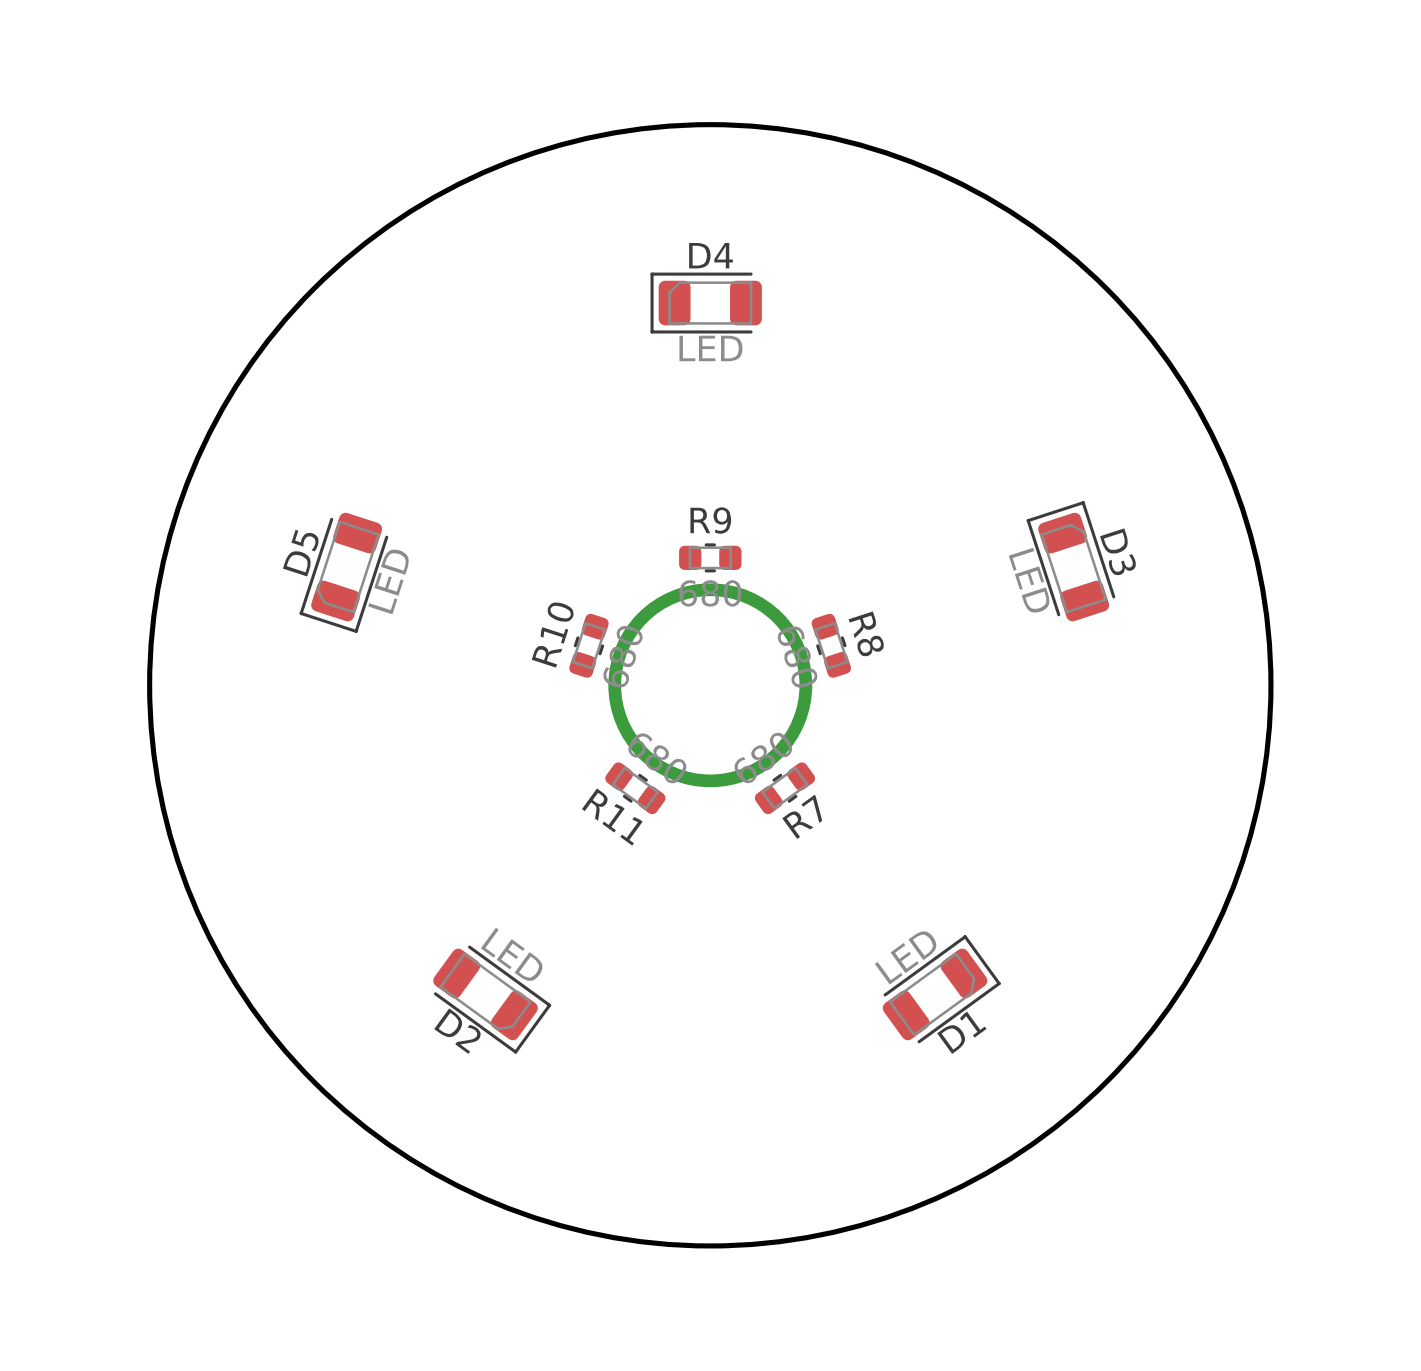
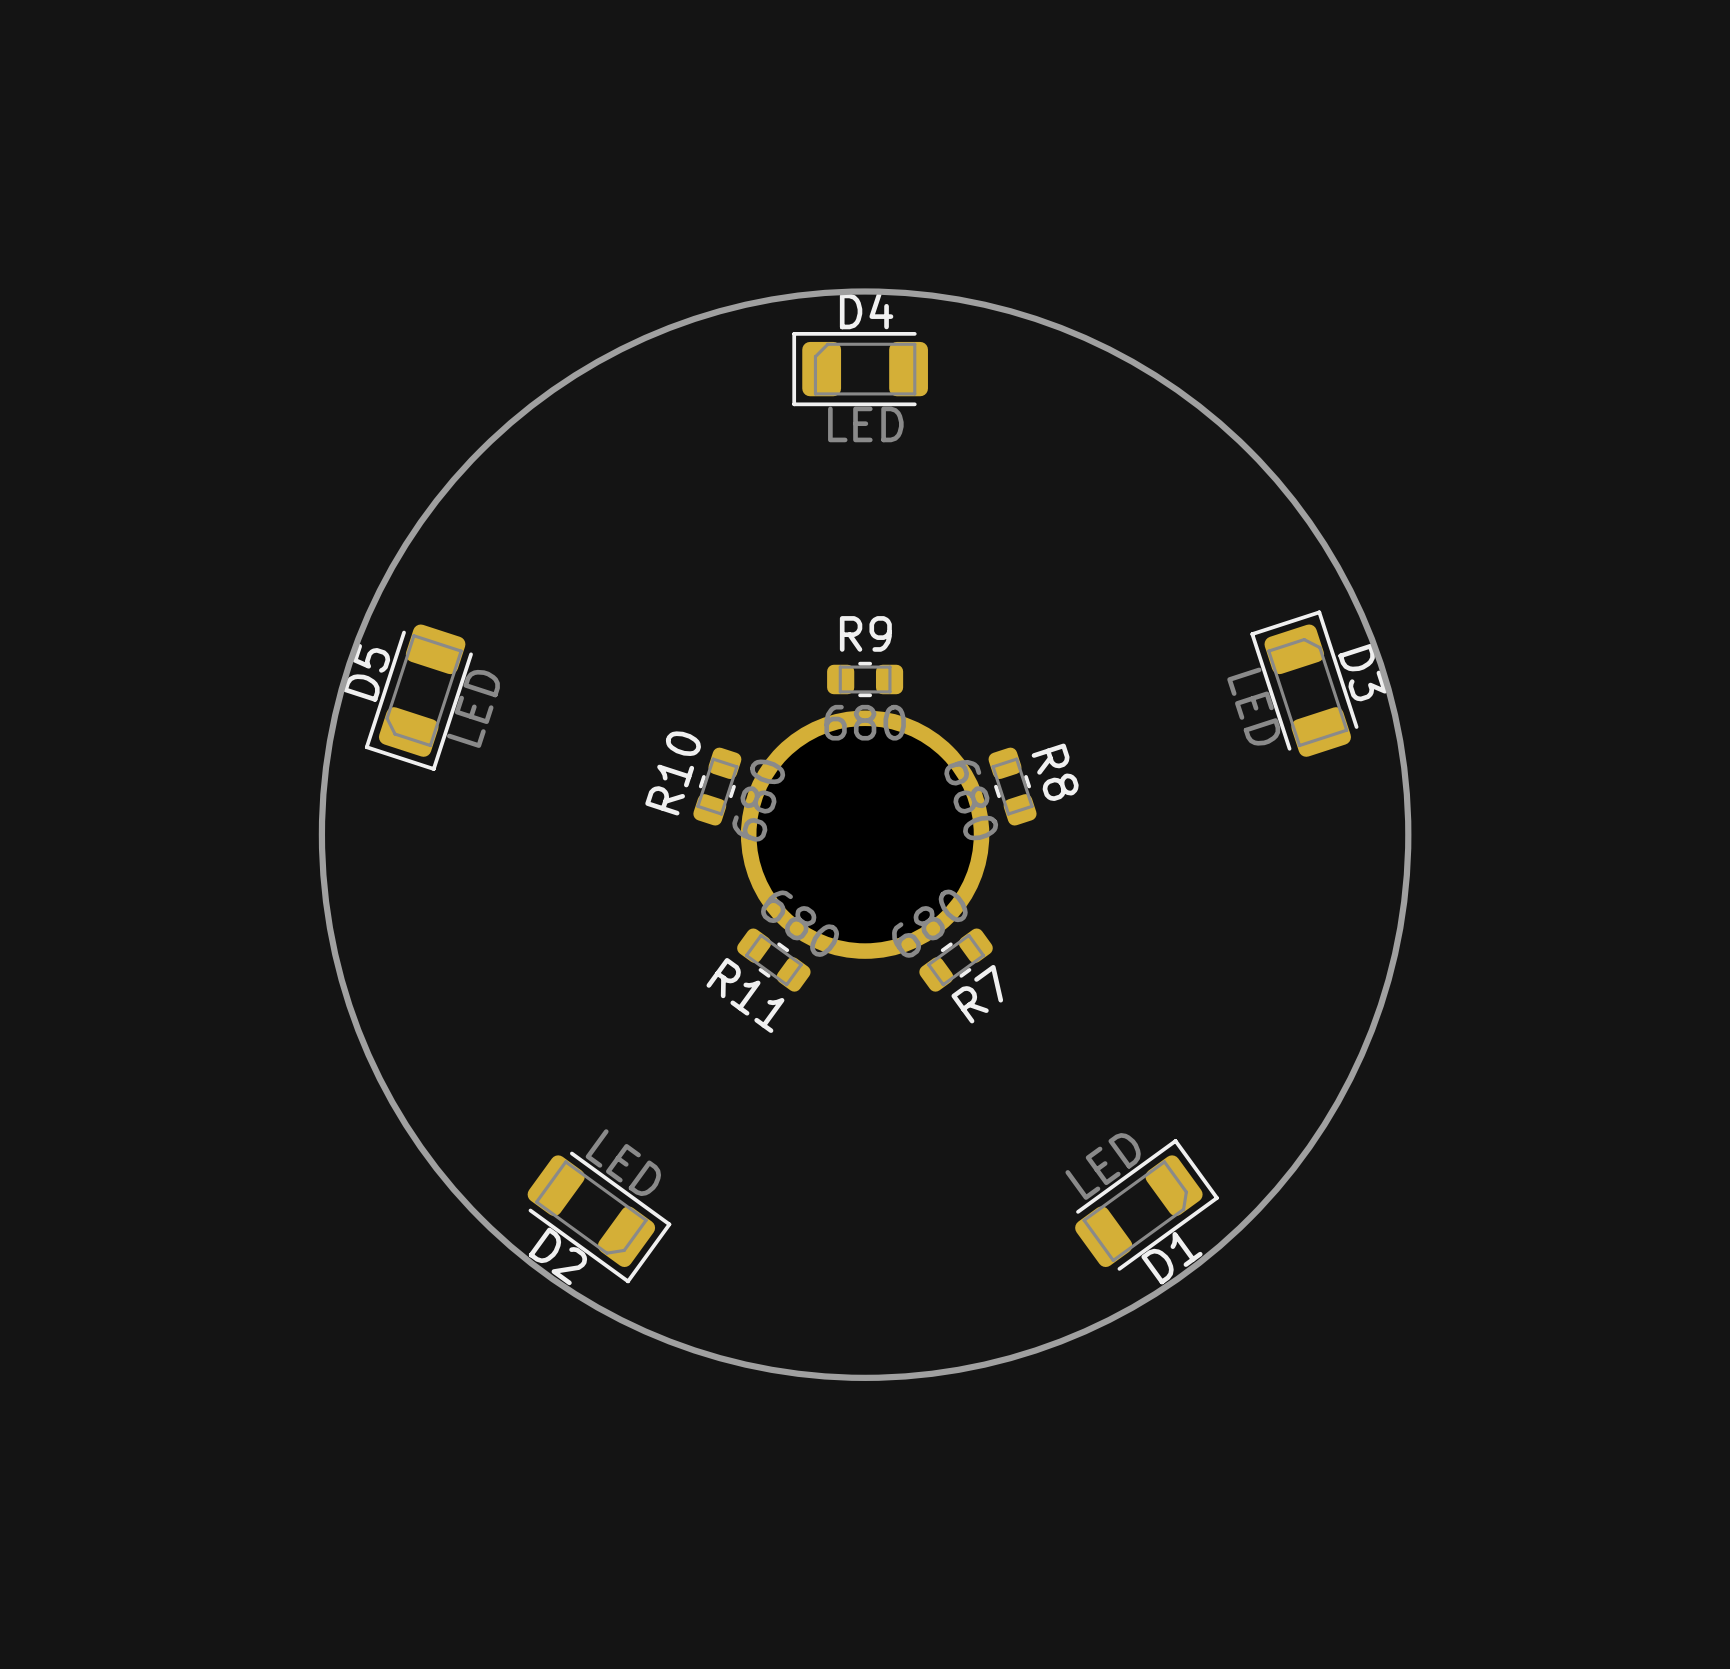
round board edge size: [147, 122, 1274, 1249] -> [318, 288, 1412, 1381]

